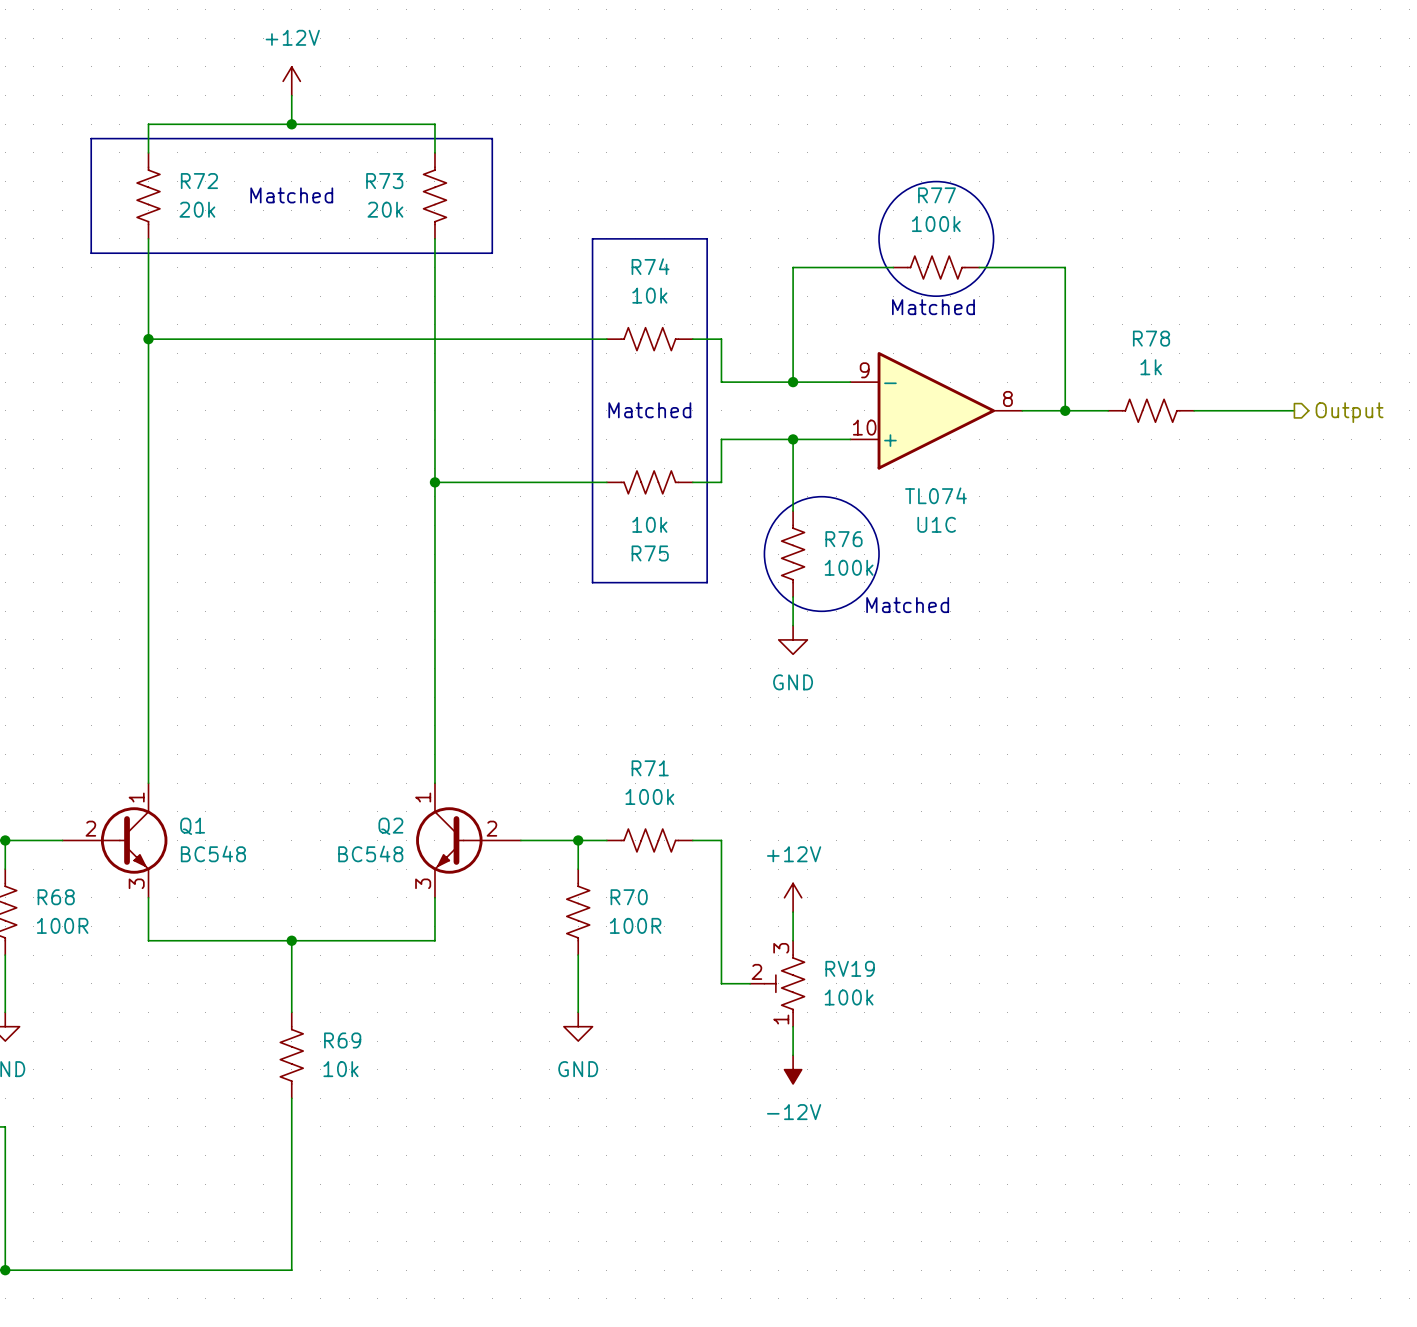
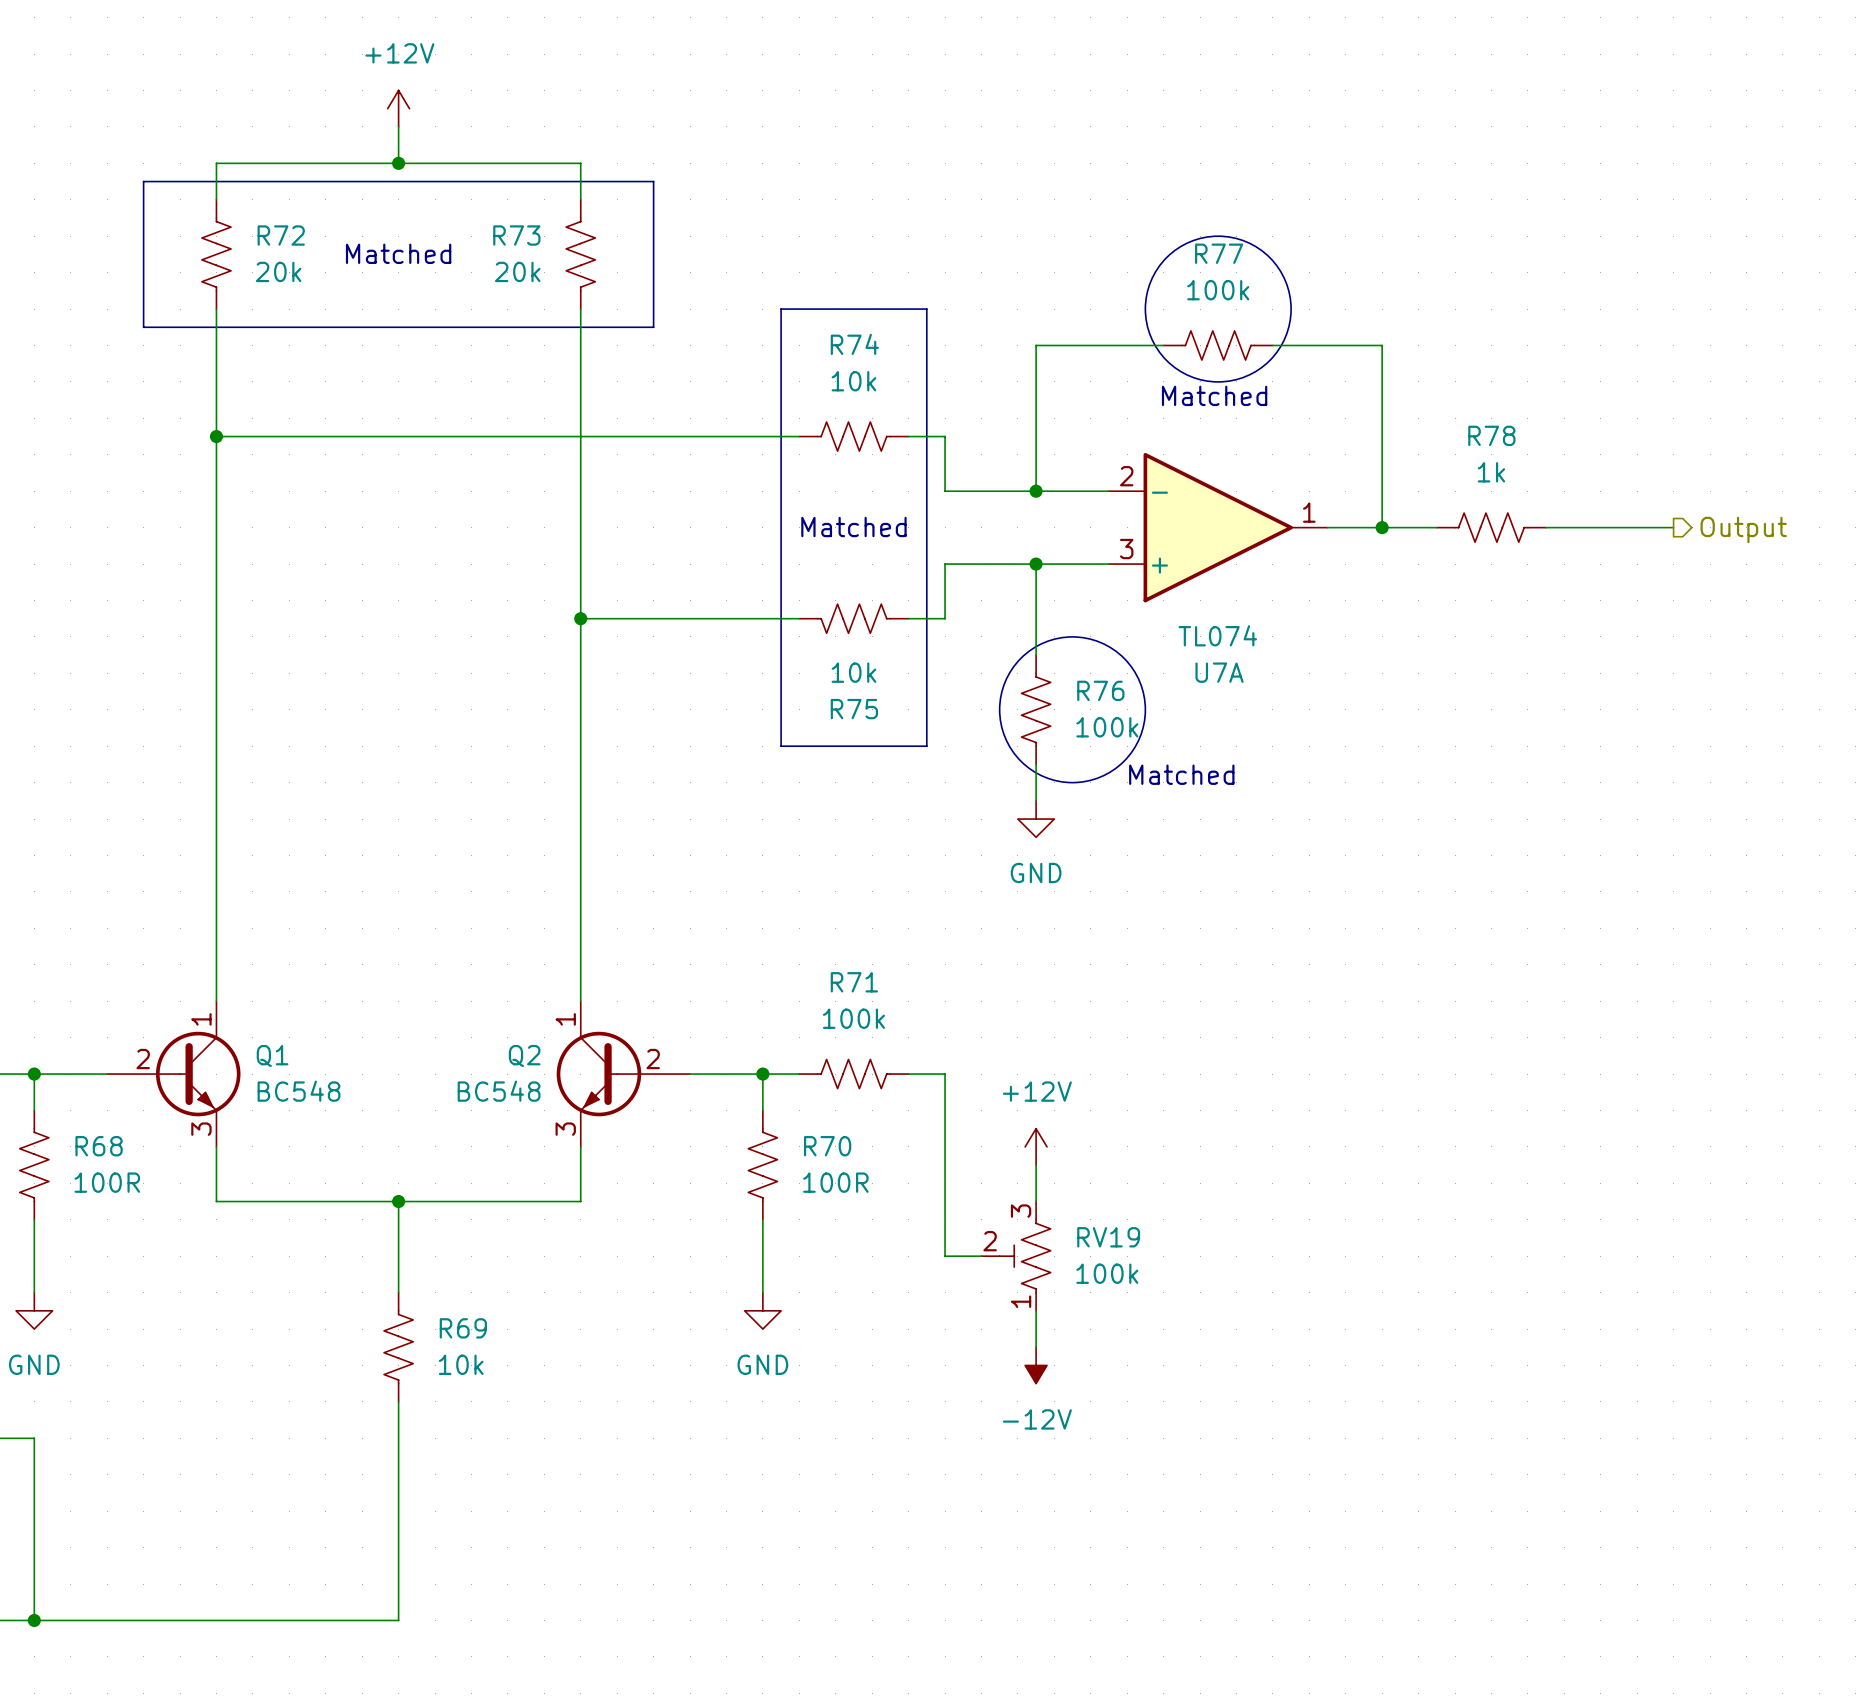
U1C pin number: 9 (864, 370) -> 2 (1126, 476)
U1C pin number: 8 (1007, 398) -> 1 (1309, 512)
U1C pin number: 10 (864, 427) -> 3 (1126, 549)
U1C name: U1C (936, 524) -> U7A (1219, 672)

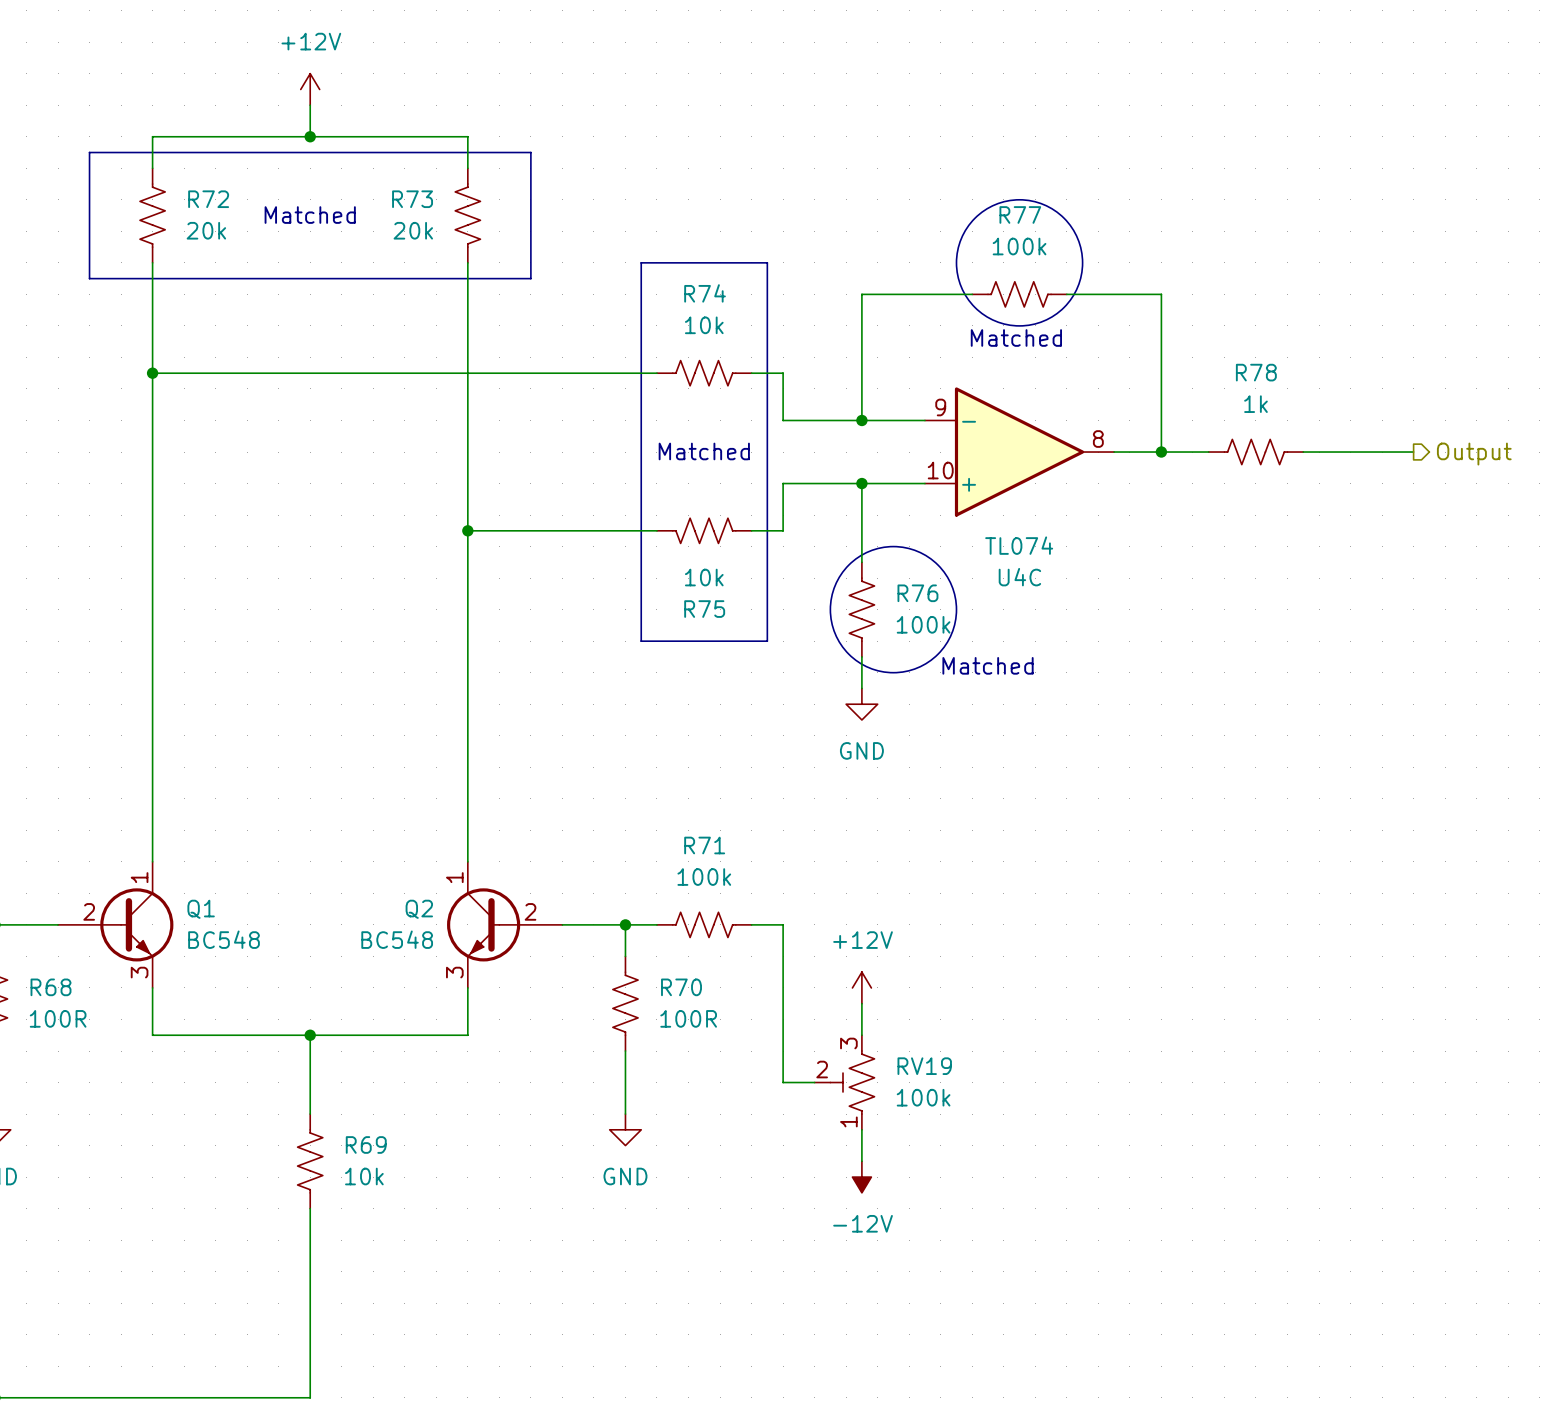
U7A pin number: 2 (1126, 476) -> 9 (940, 407)
U7A pin number: 1 (1309, 512) -> 8 (1098, 439)
U7A pin number: 3 (1126, 549) -> 10 (940, 470)
U7A name: U7A (1219, 672) -> U4C (1019, 577)

